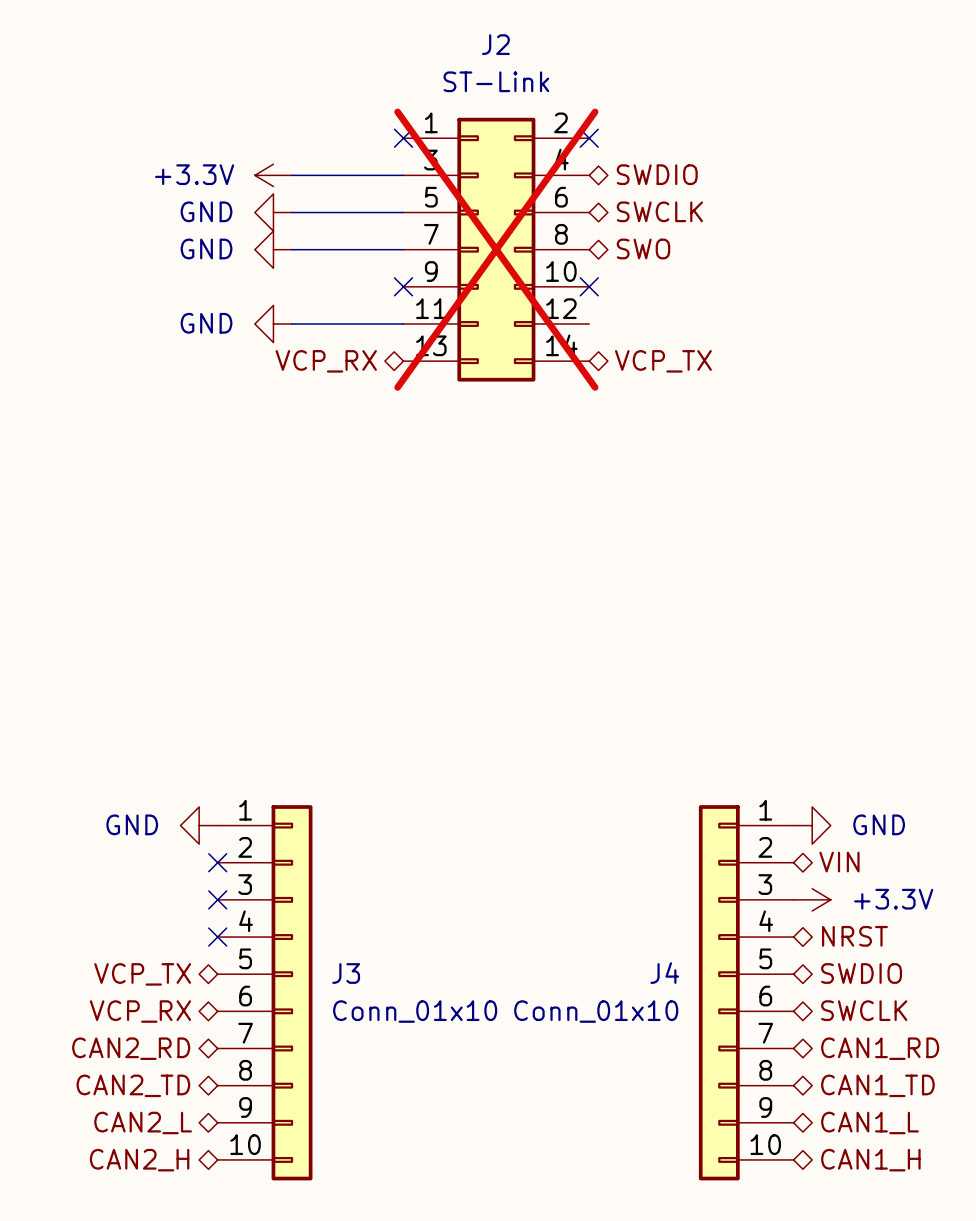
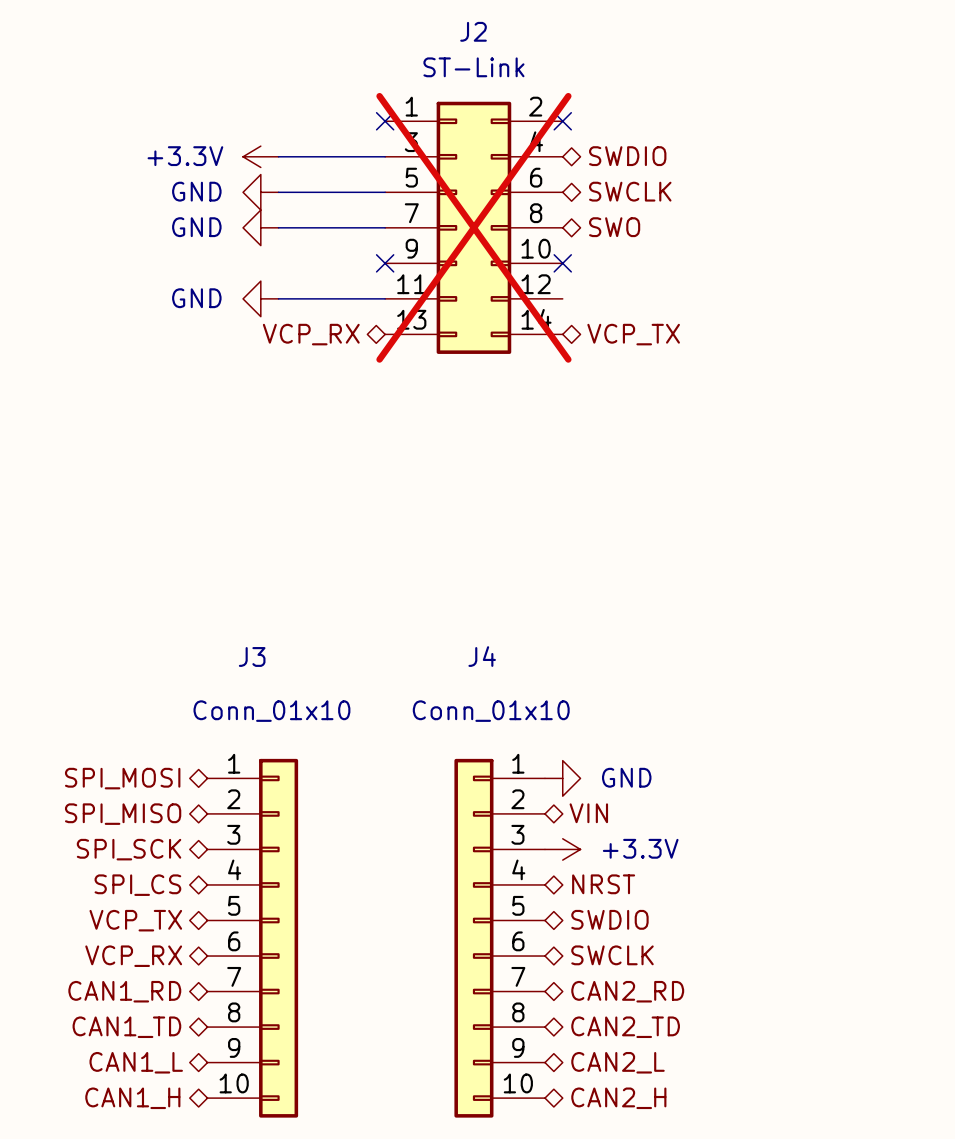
hierarchical label: none -> SPI_MOSI (122, 778)
power symbol: GND (199, 825) -> none
power symbol: none -> GND (562, 778)
power symbol: GND (812, 825) -> none
hierarchical label: none -> SPI_MISO (123, 814)
no-connect mark: (217, 862) -> none
hierarchical label position: VIN (839, 862) -> VIN (588, 813)
no-connect mark: (217, 899) -> none
power symbol position: +3.3V (812, 899) -> +3.3V (562, 849)
hierarchical label: none -> SPI_SCK (129, 849)
hierarchical label position: NRST (854, 936) -> NRST (603, 884)
hierarchical label: none -> SPI_CS (137, 885)
no-connect mark: (217, 937) -> none
J3 name position: J3 (346, 973) -> J3 (252, 656)
J4 name position: J4 (664, 973) -> J4 (482, 656)
hierarchical label position: SWDIO (861, 973) -> SWDIO (609, 919)
J4 position: (746, 992) -> (499, 938)
hierarchical label position: SWCLK (864, 1010) -> SWCLK (612, 955)
J3 value position: Conn_01x10 (415, 1011) -> Conn_01x10 (271, 711)
J4 value position: Conn_01x10 (596, 1011) -> Conn_01x10 (491, 711)
hierarchical label: CAN2_RD (131, 1048) -> CAN1_RD (124, 991)
hierarchical label: none -> CAN2_RD (627, 991)
hierarchical label: CAN1_RD (880, 1048) -> none
hierarchical label: CAN2_TD (133, 1085) -> CAN1_TD (126, 1027)
hierarchical label: none -> CAN2_TD (625, 1027)
hierarchical label: CAN1_TD (877, 1085) -> none
hierarchical label: CAN2_L (143, 1122) -> CAN1_L (136, 1062)
hierarchical label: none -> CAN2_L (617, 1062)
hierarchical label: CAN1_L (869, 1122) -> none
hierarchical label: CAN2_H (139, 1160) -> CAN1_H (132, 1098)
hierarchical label: none -> CAN2_H (618, 1098)
hierarchical label: CAN1_H (870, 1160) -> none

